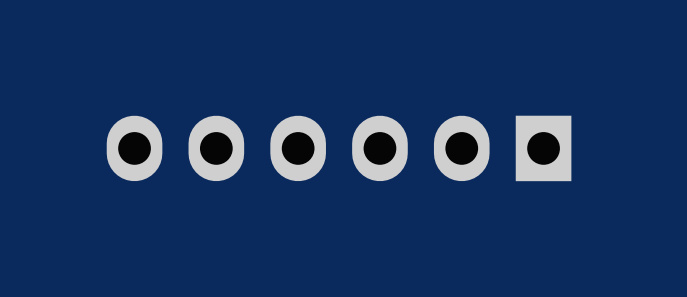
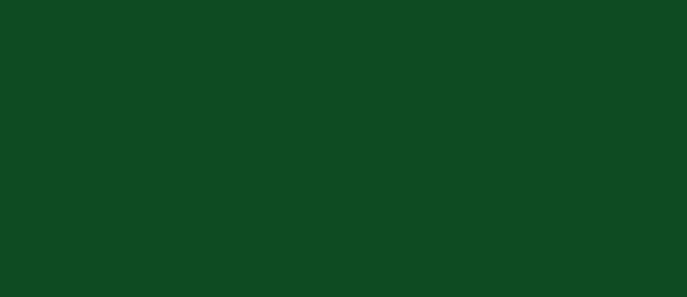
part: (339, 148) -> none

